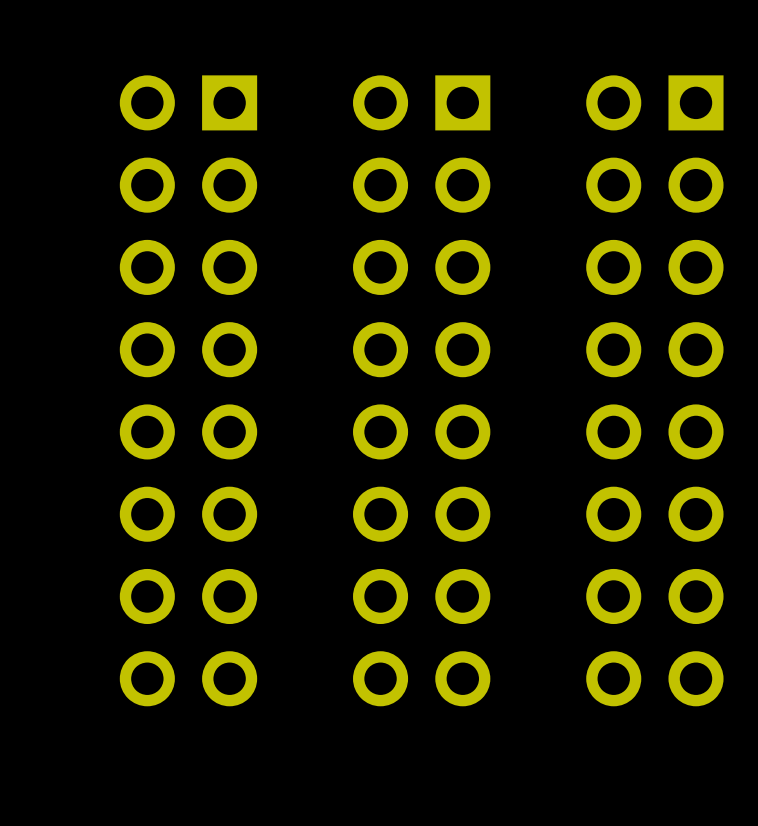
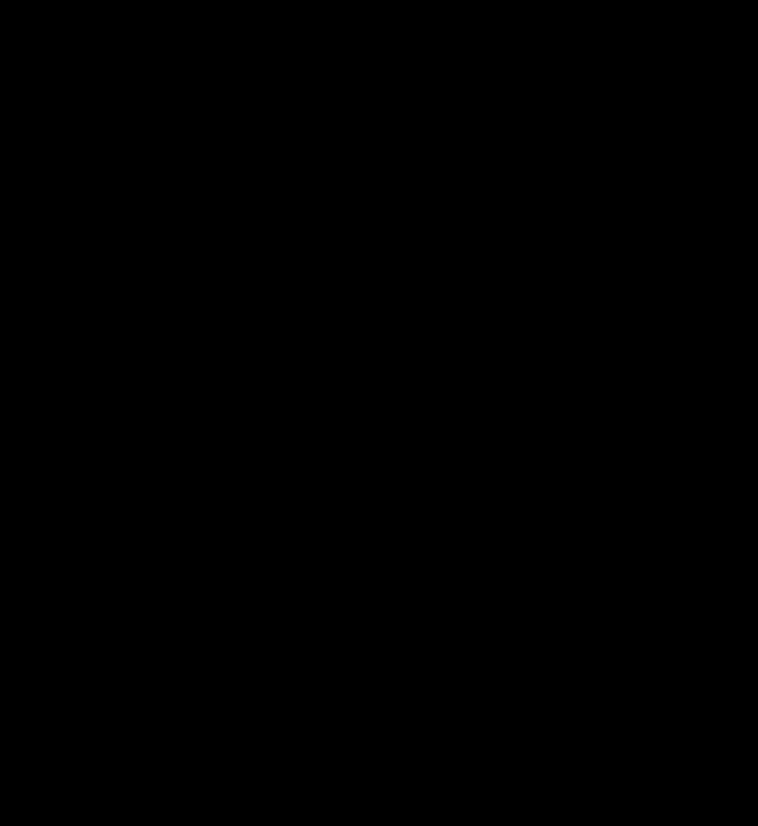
part: (188, 390) -> none
part: (421, 390) -> none
part: (654, 390) -> none

